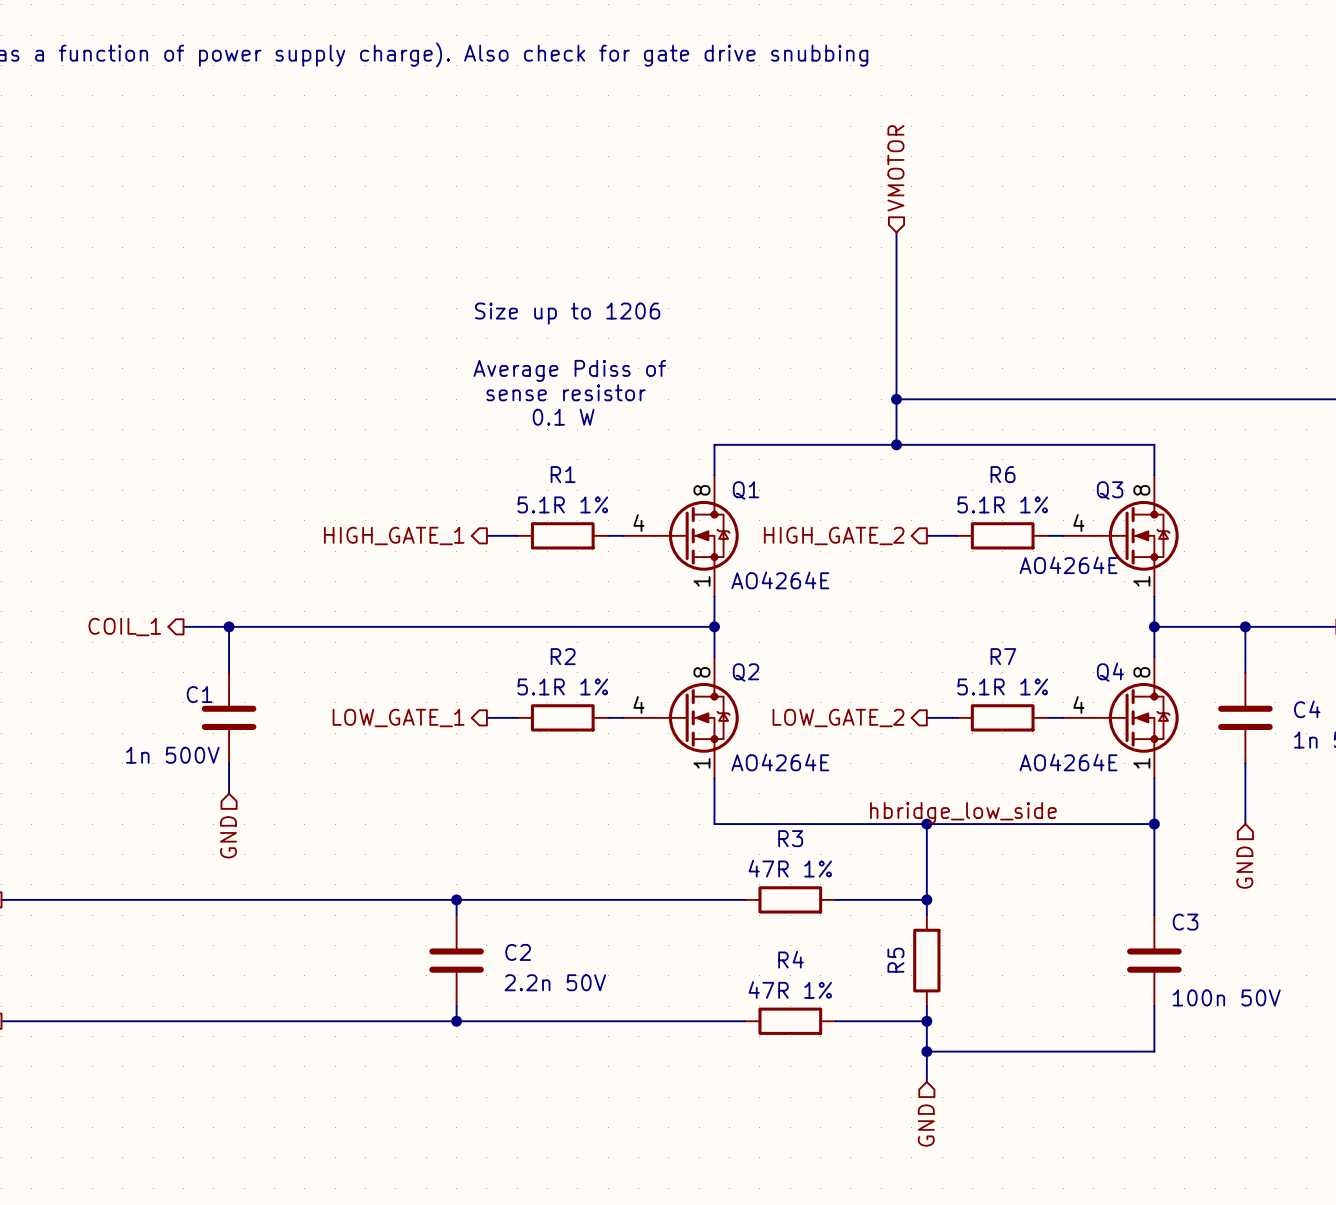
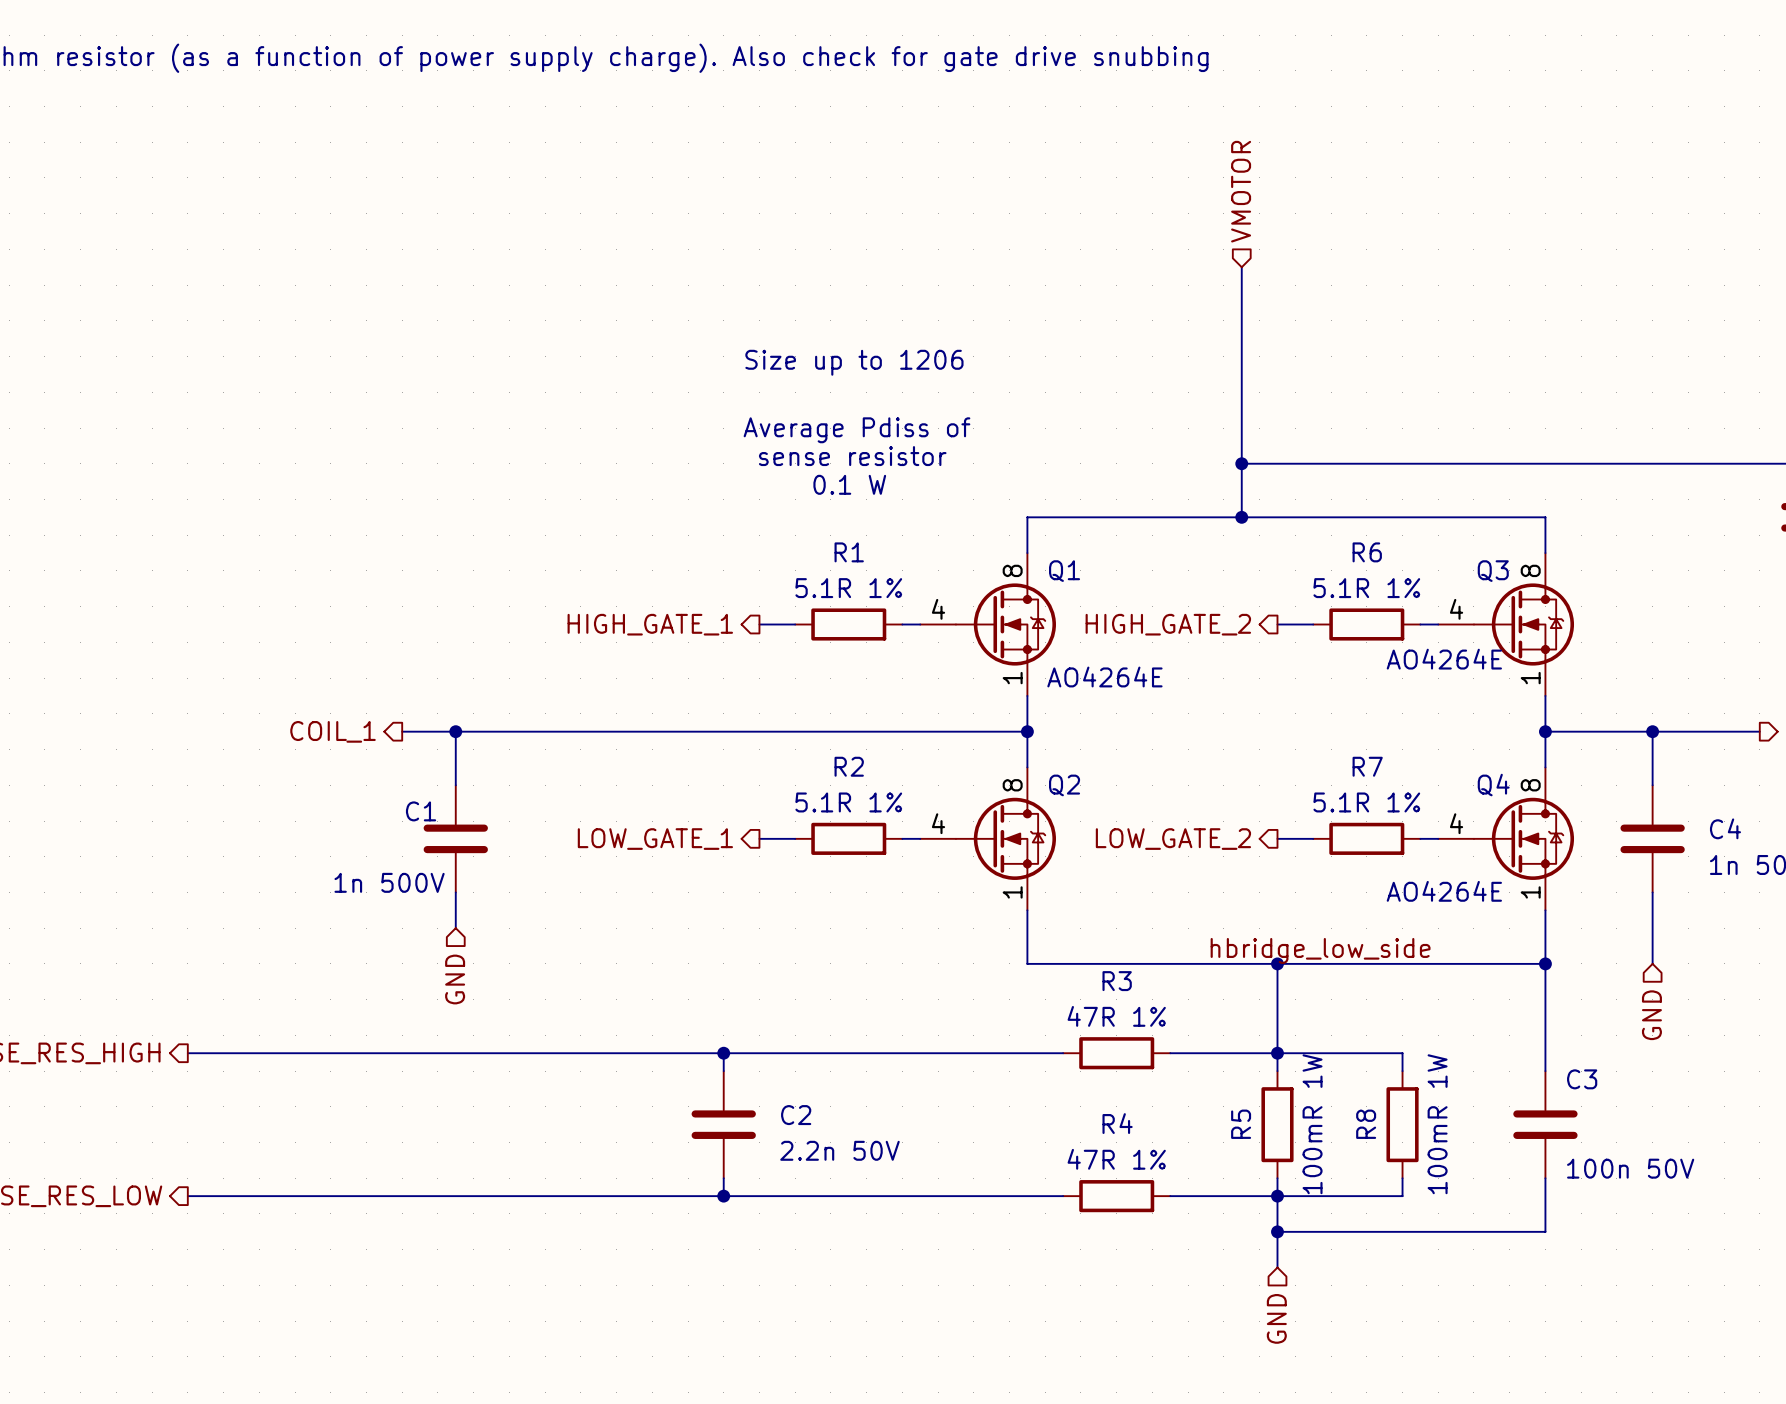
Q2 value: AO4264E (780, 762) -> none
wire: none -> (1277, 1053) (1402, 1053) (1402, 1071)
R5 value: none -> 100mR 1W (1312, 1124)
R8: none -> 100mR 1W (1402, 1124)
wire: none -> (1402, 1178) (1402, 1196) (1277, 1196)

